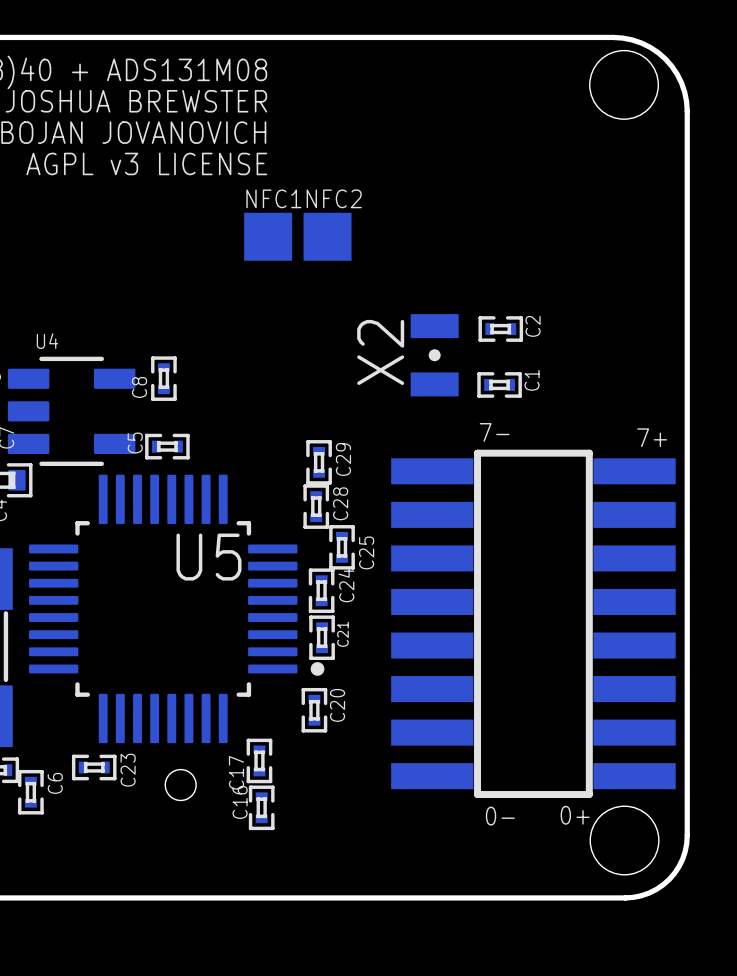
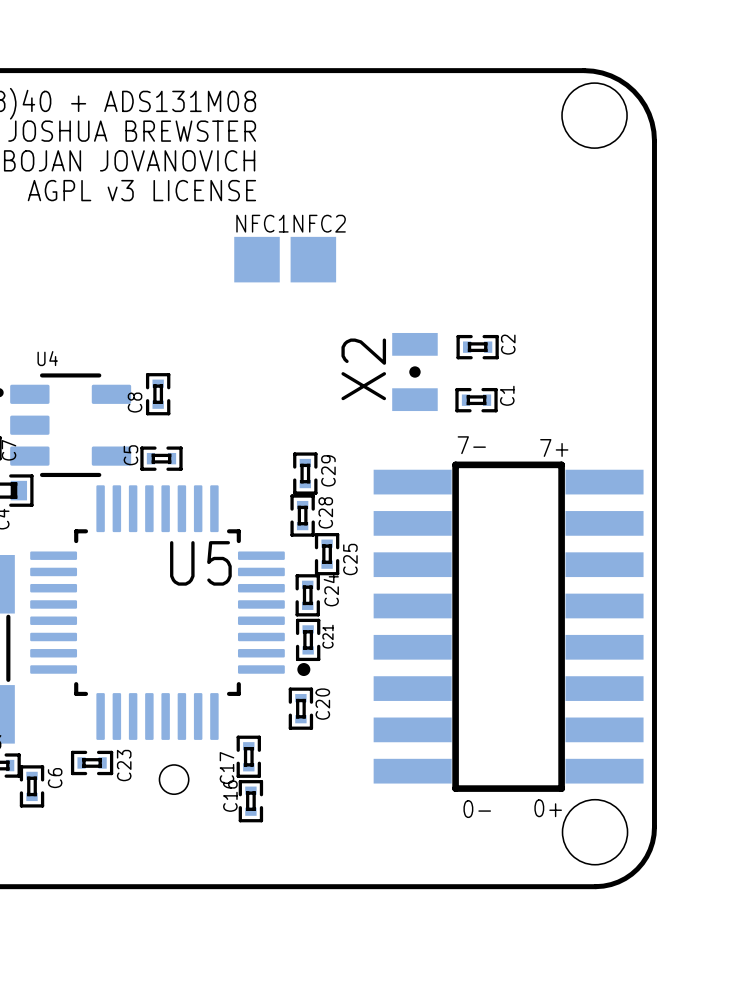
text position: 7+ (652, 437) -> 7+ (554, 447)

